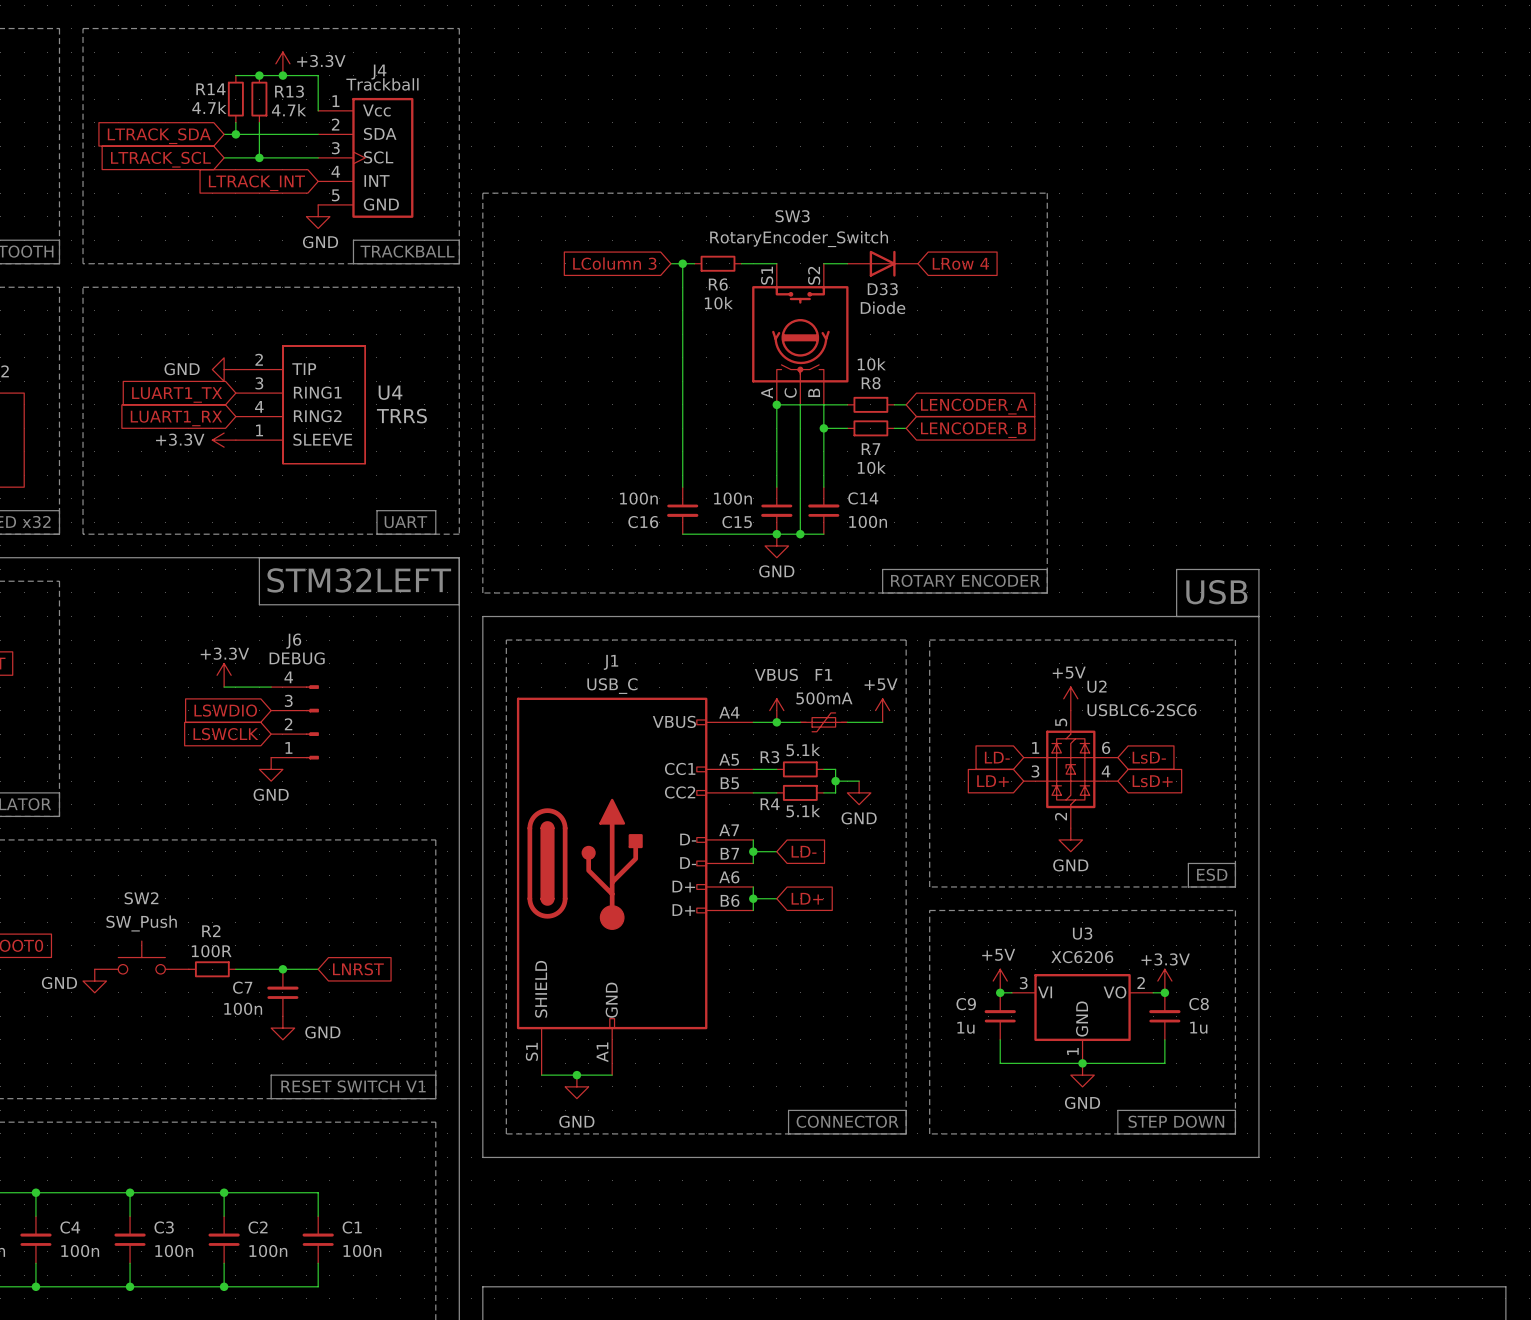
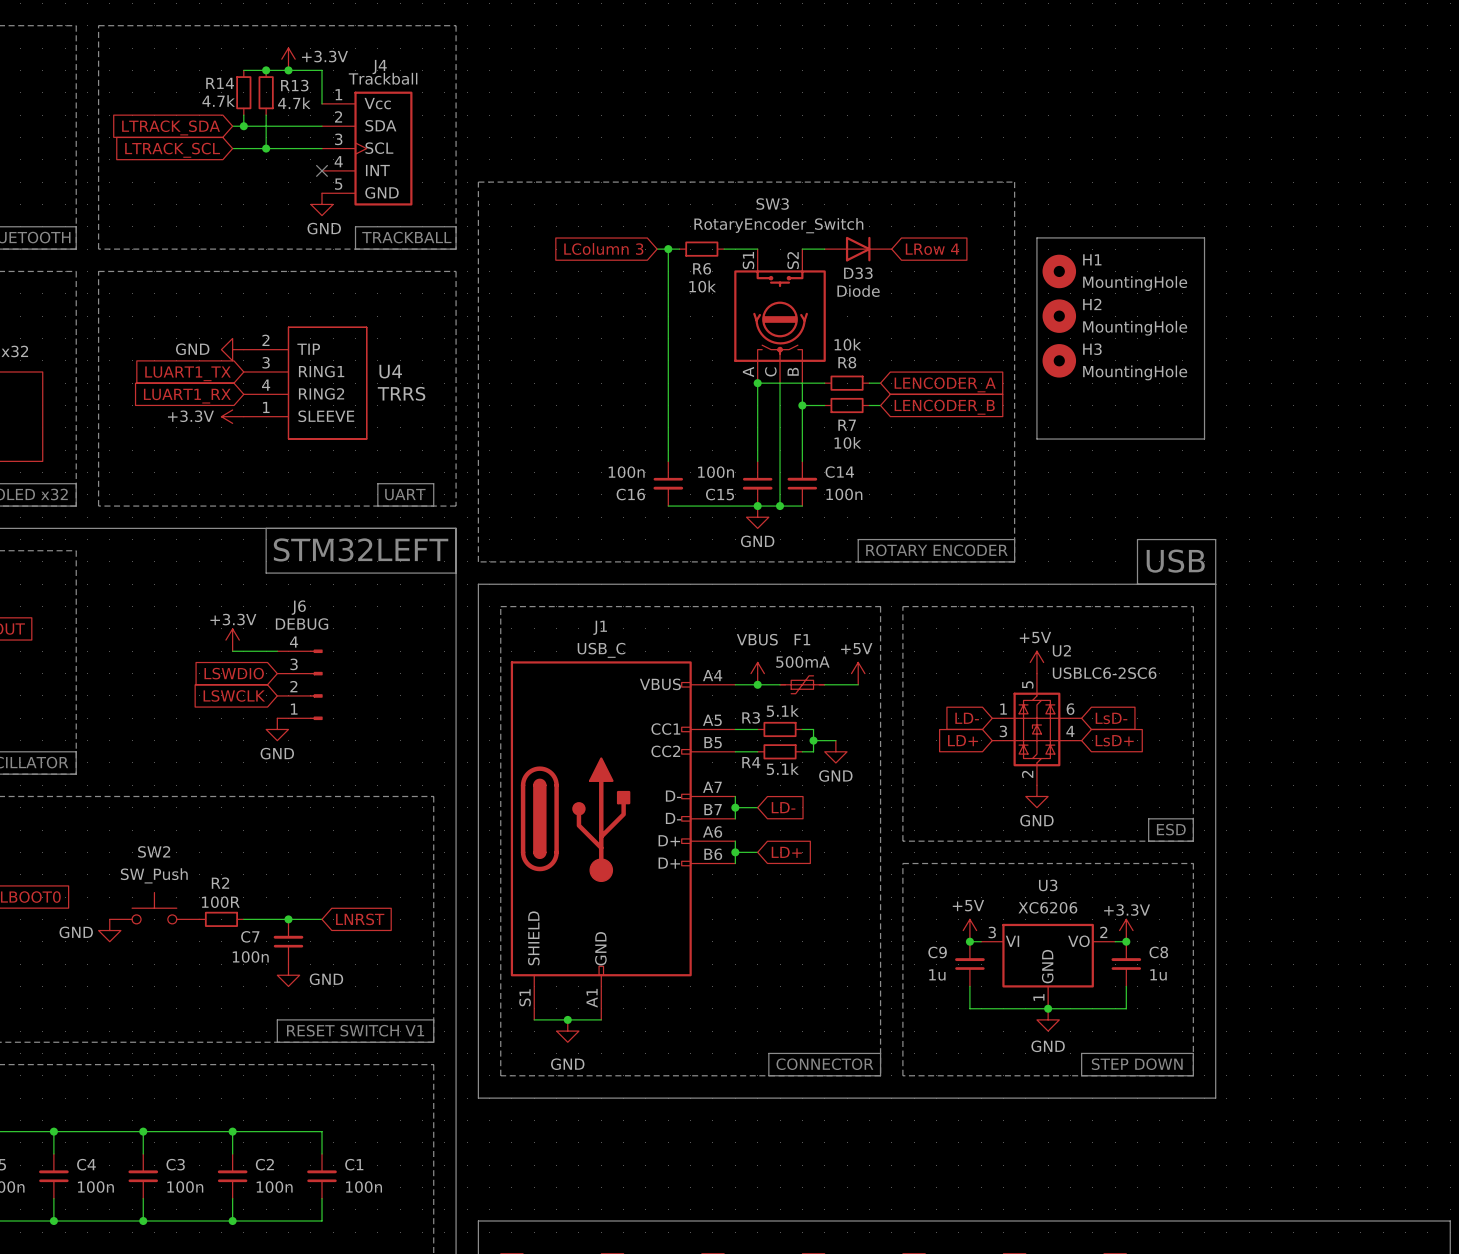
no-connect mark: none -> (322, 170)
global label: LTRACK_INT (256, 183) -> none
line: none -> (1036, 237) (1204, 237) (1204, 439) (1036, 439) (1036, 237)
H1: none -> MountingHole (1059, 271)
H2: none -> MountingHole (1059, 316)
H3: none -> MountingHole (1059, 360)

